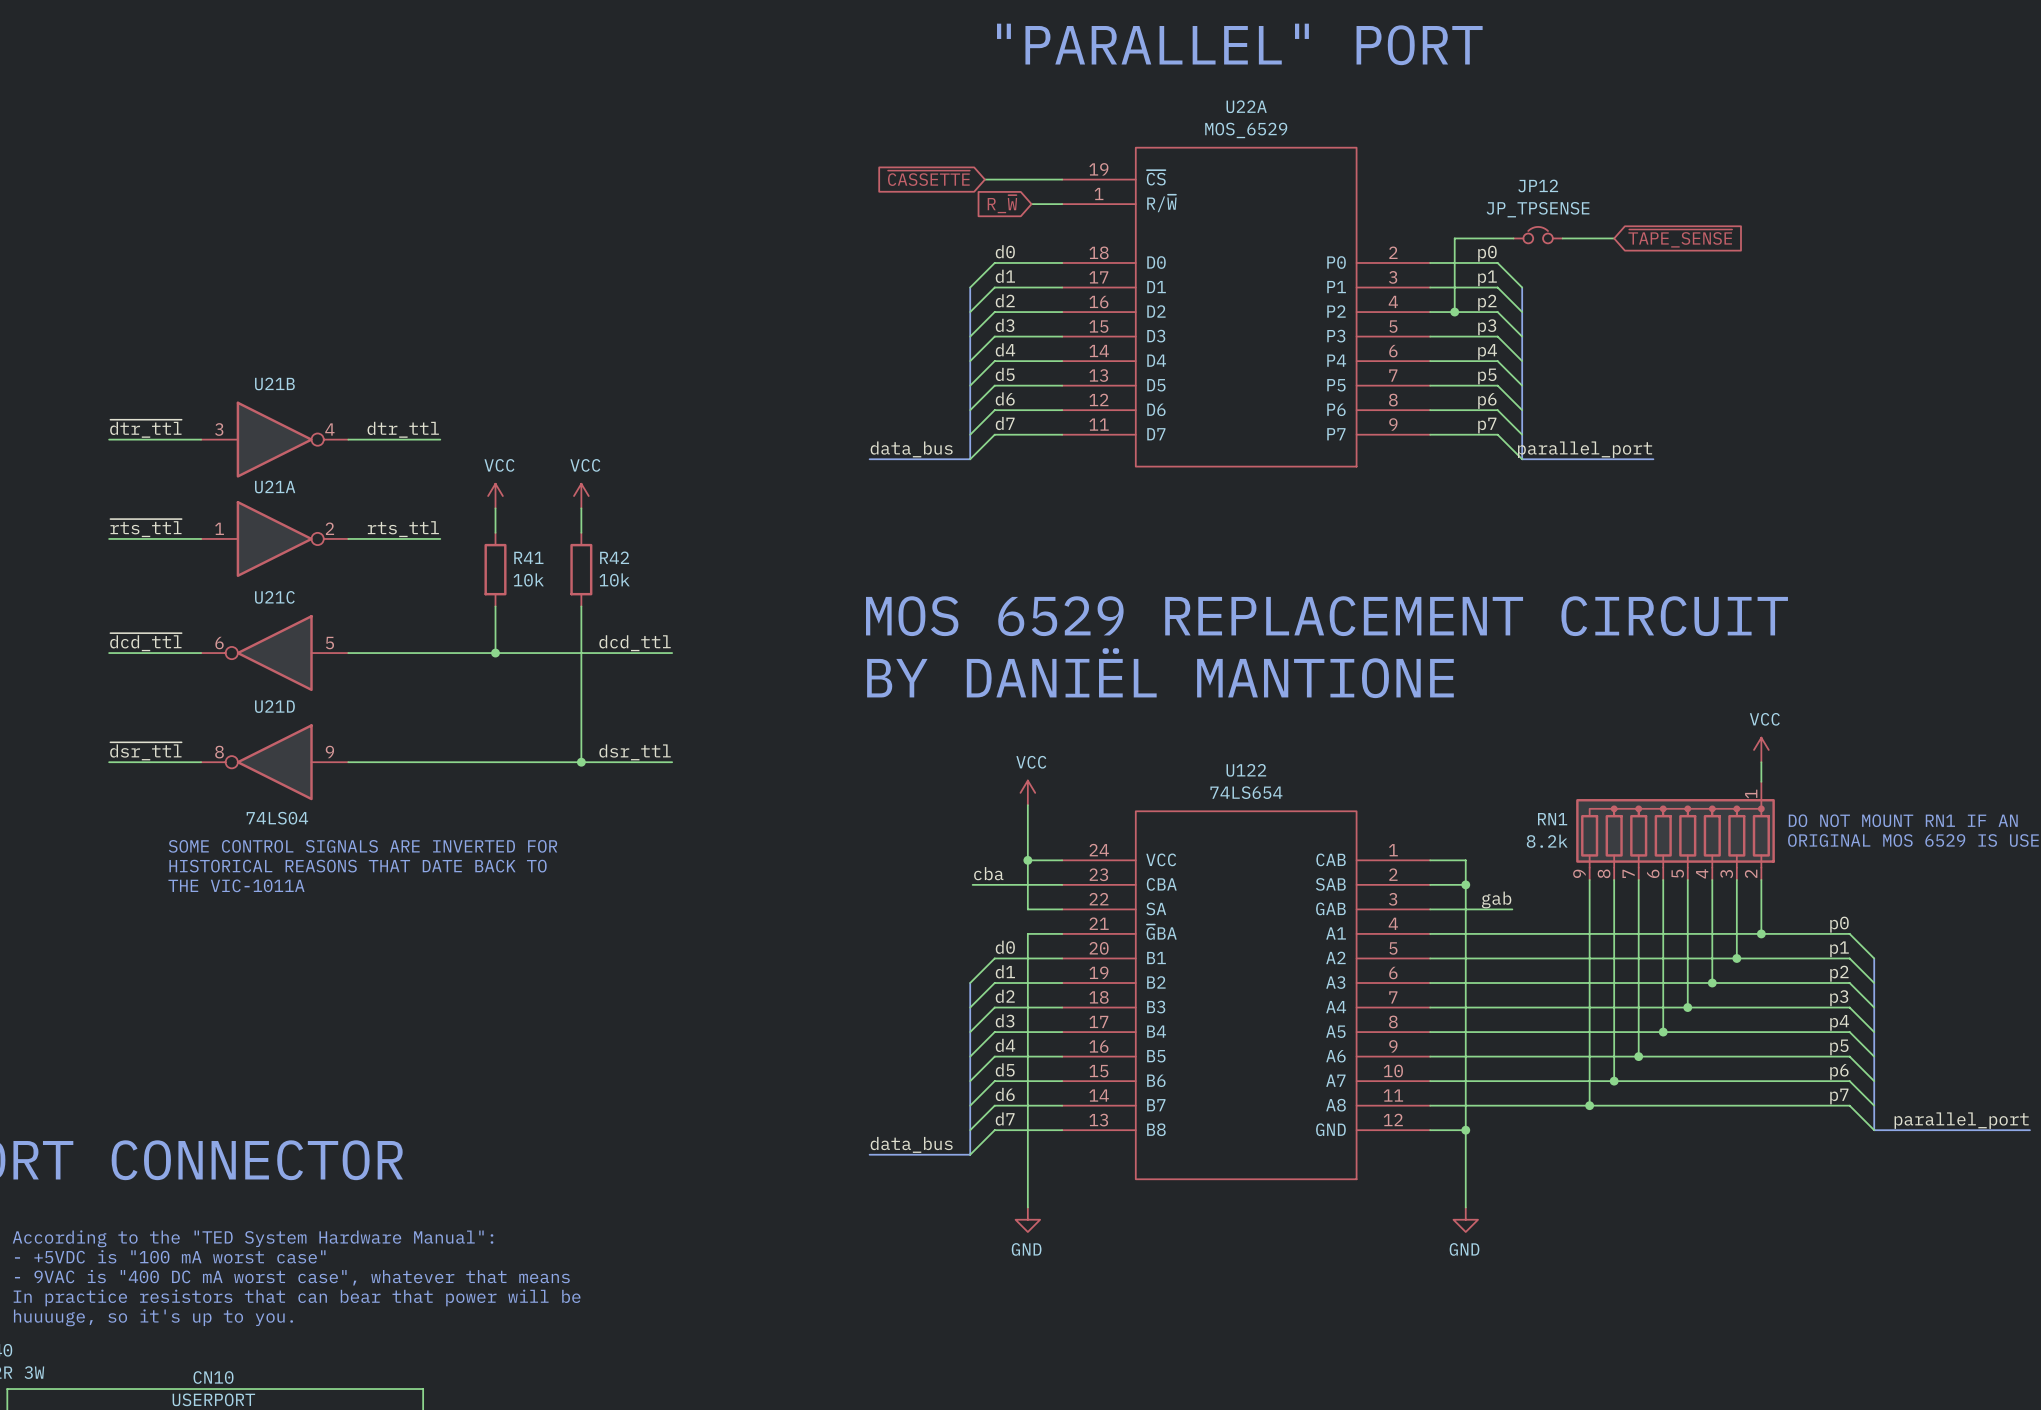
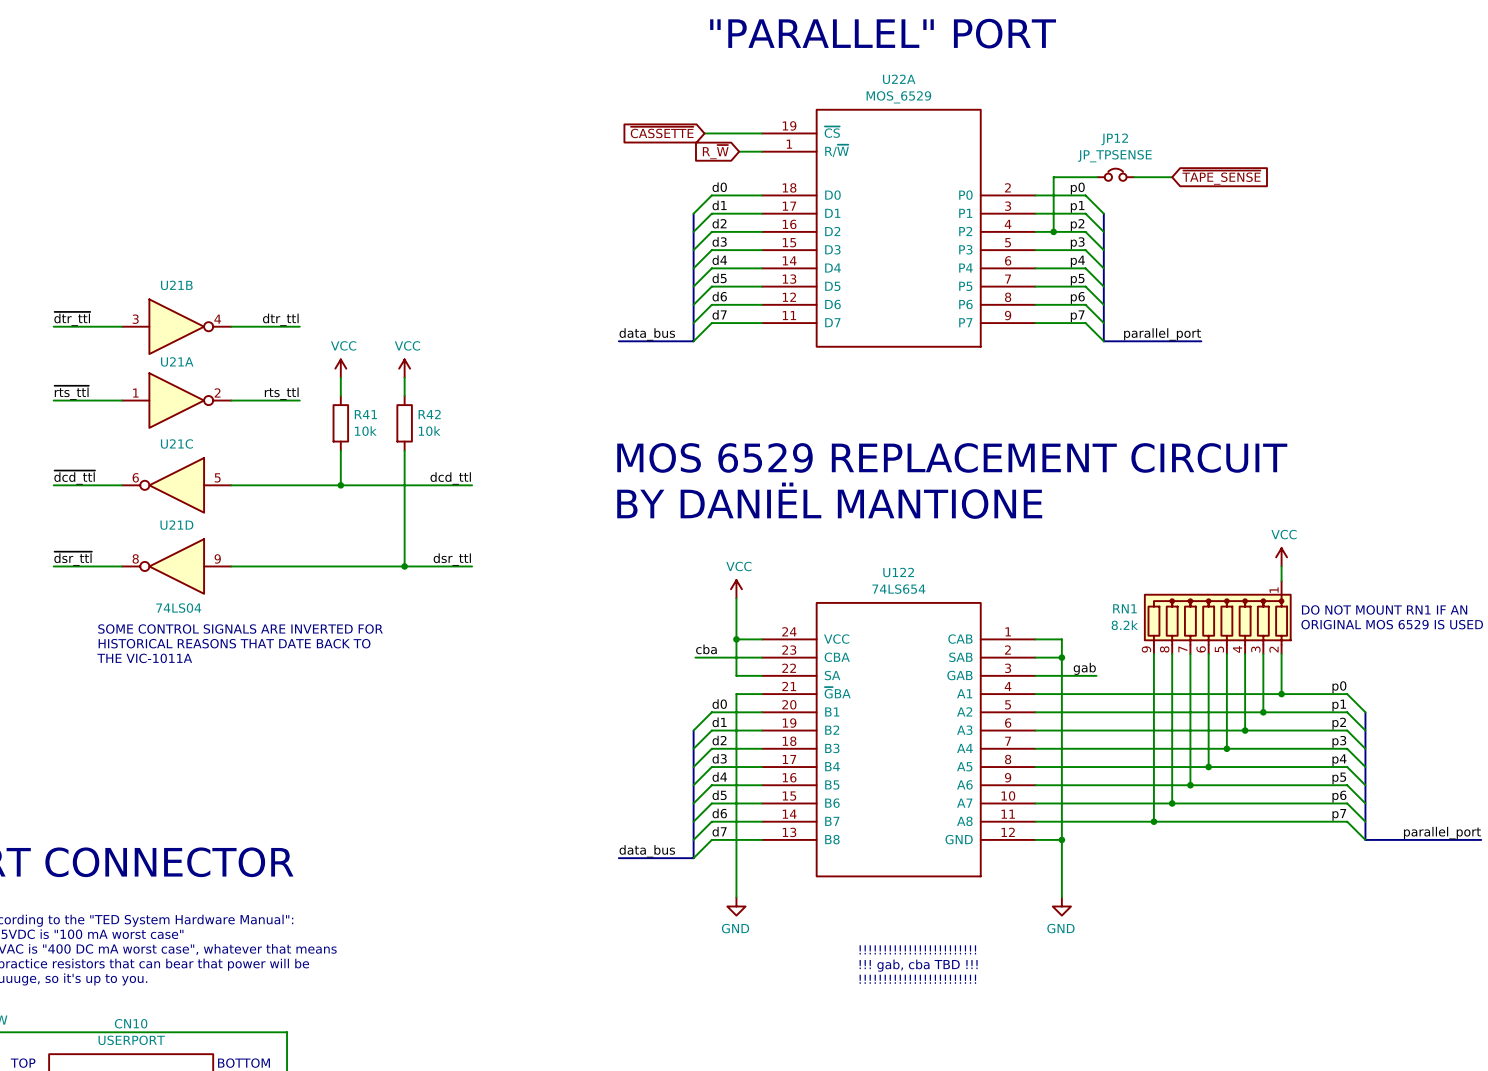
text: none -> !!!!!!!!!!!!!!!!!!!!!!!! (917, 949)
text: none -> !!! gab, cba TBD !!! (918, 965)
text: none -> !!!!!!!!!!!!!!!!!!!!!!!! (917, 979)

